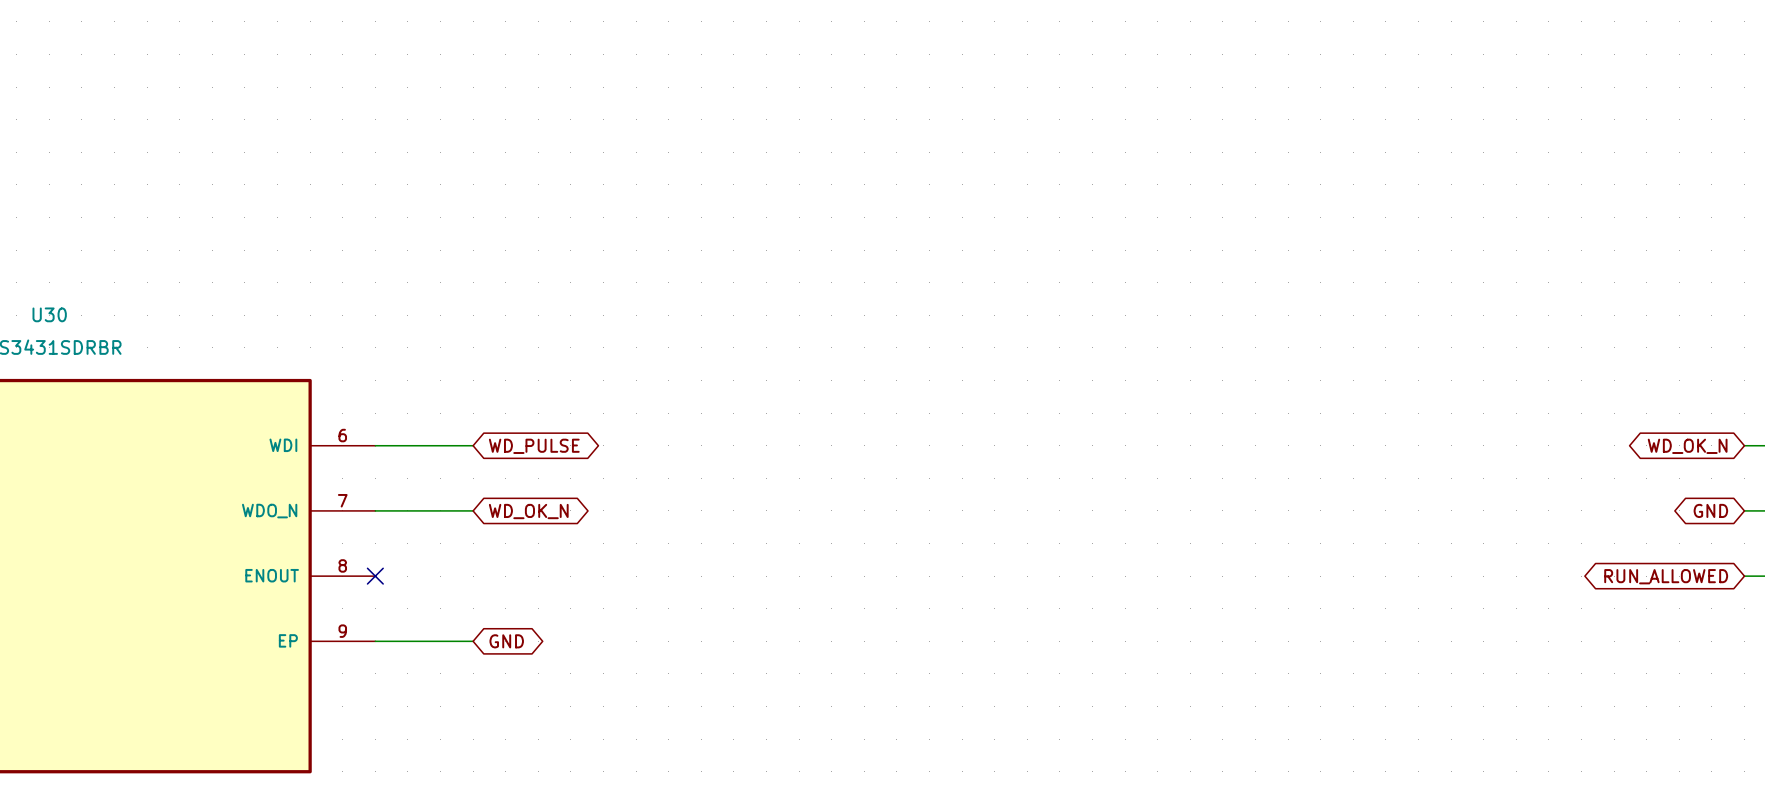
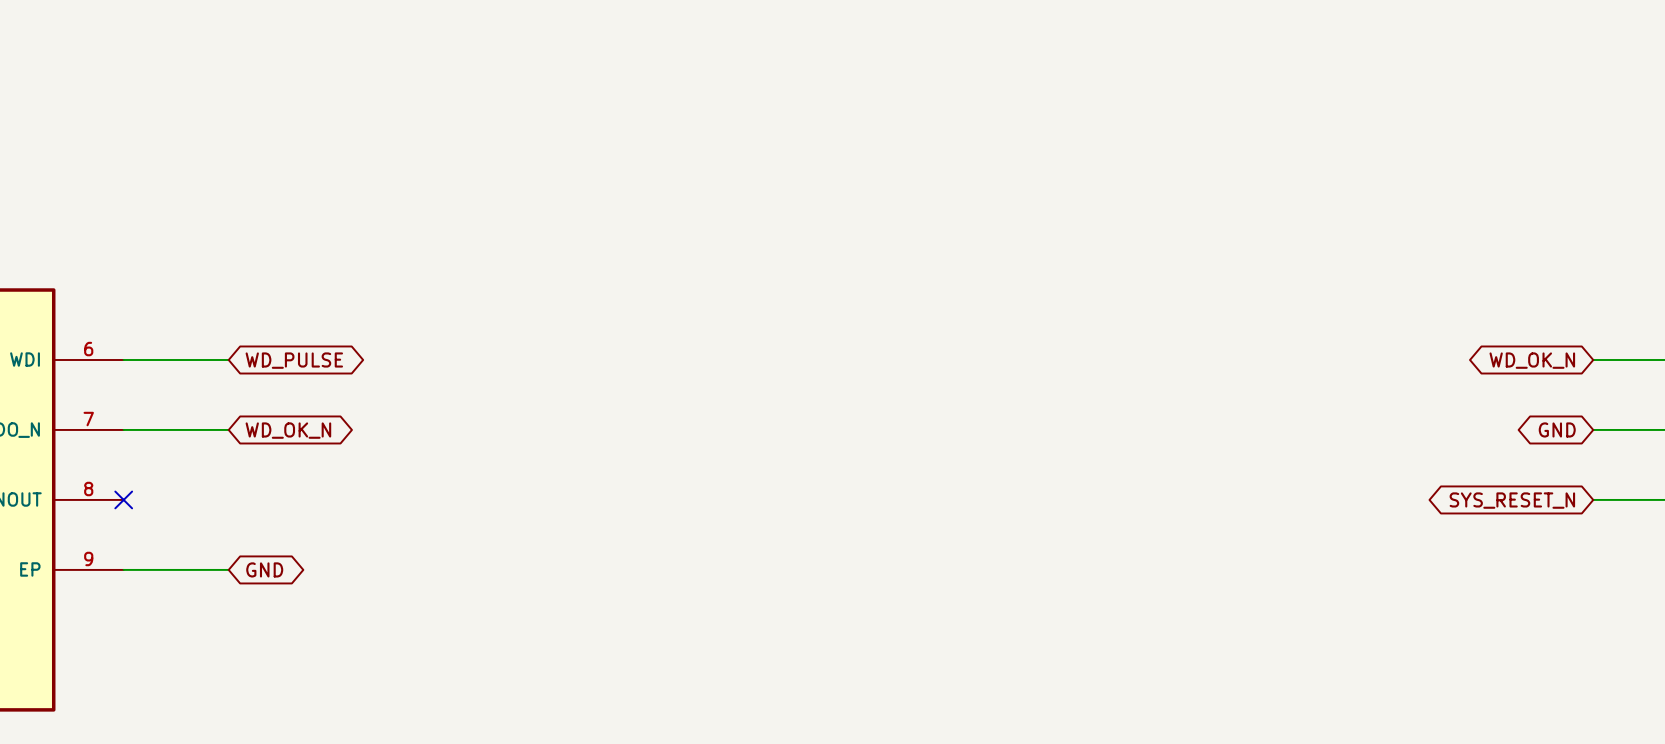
global label: RUN_ALLOWED (1666, 576) -> SYS_RESET_N (1512, 500)

